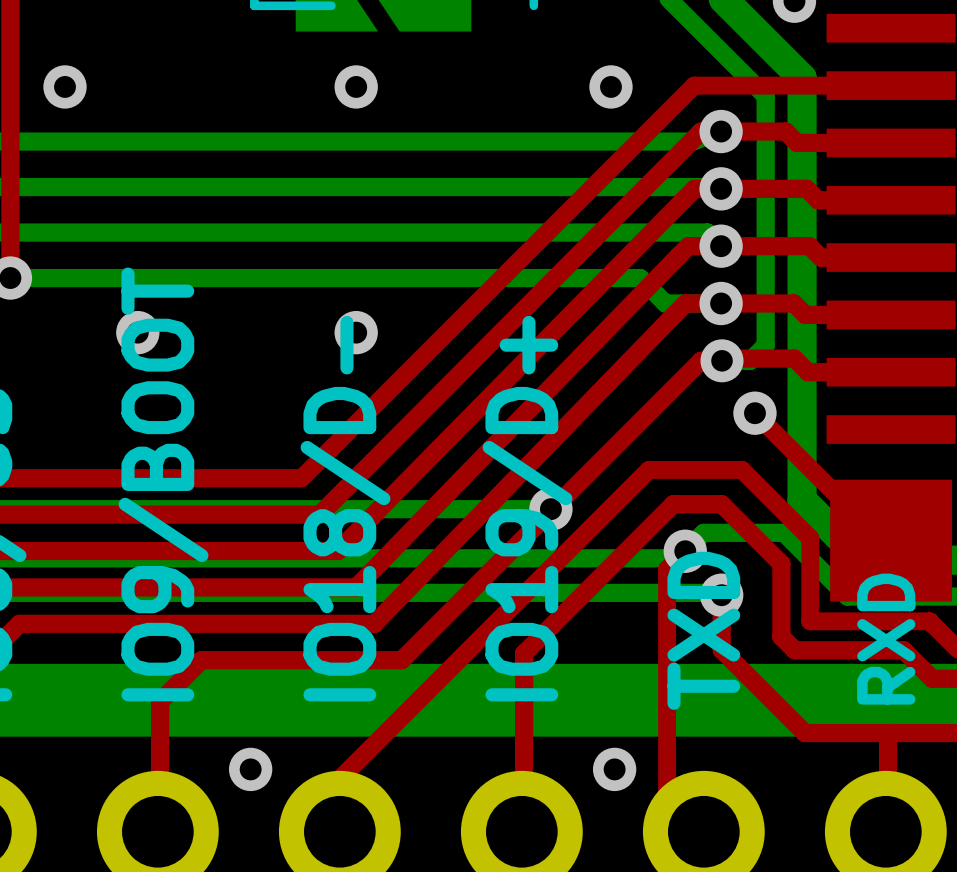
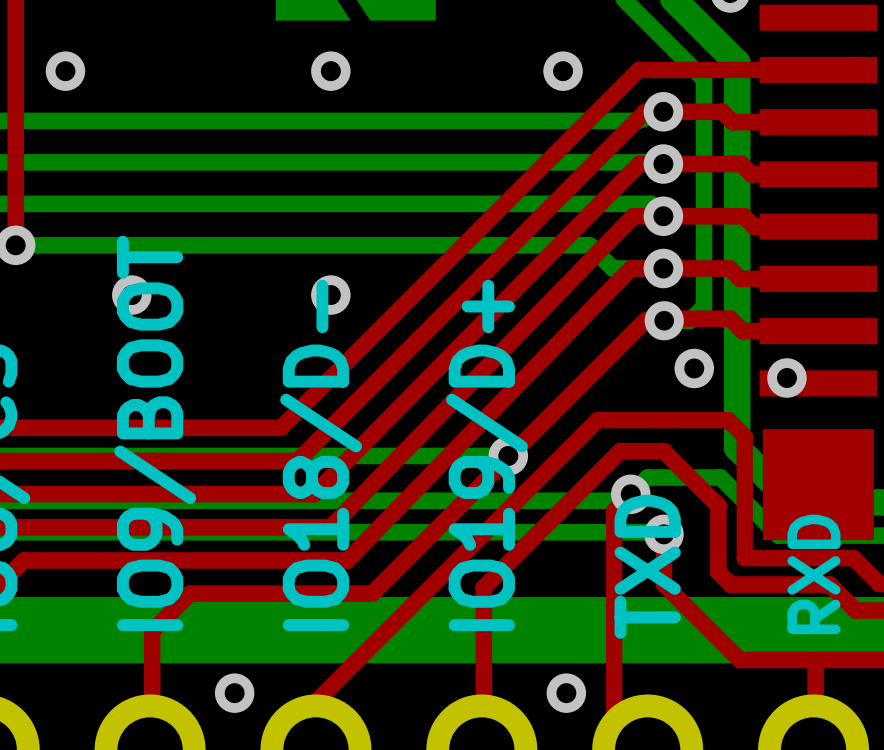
top track: (754, 413) (882, 540) (891, 540) -> none
via: none -> (786, 378)
top track: (742, 469) (810, 538) -> (682, 420) (728, 420) (744, 436) (744, 482)

